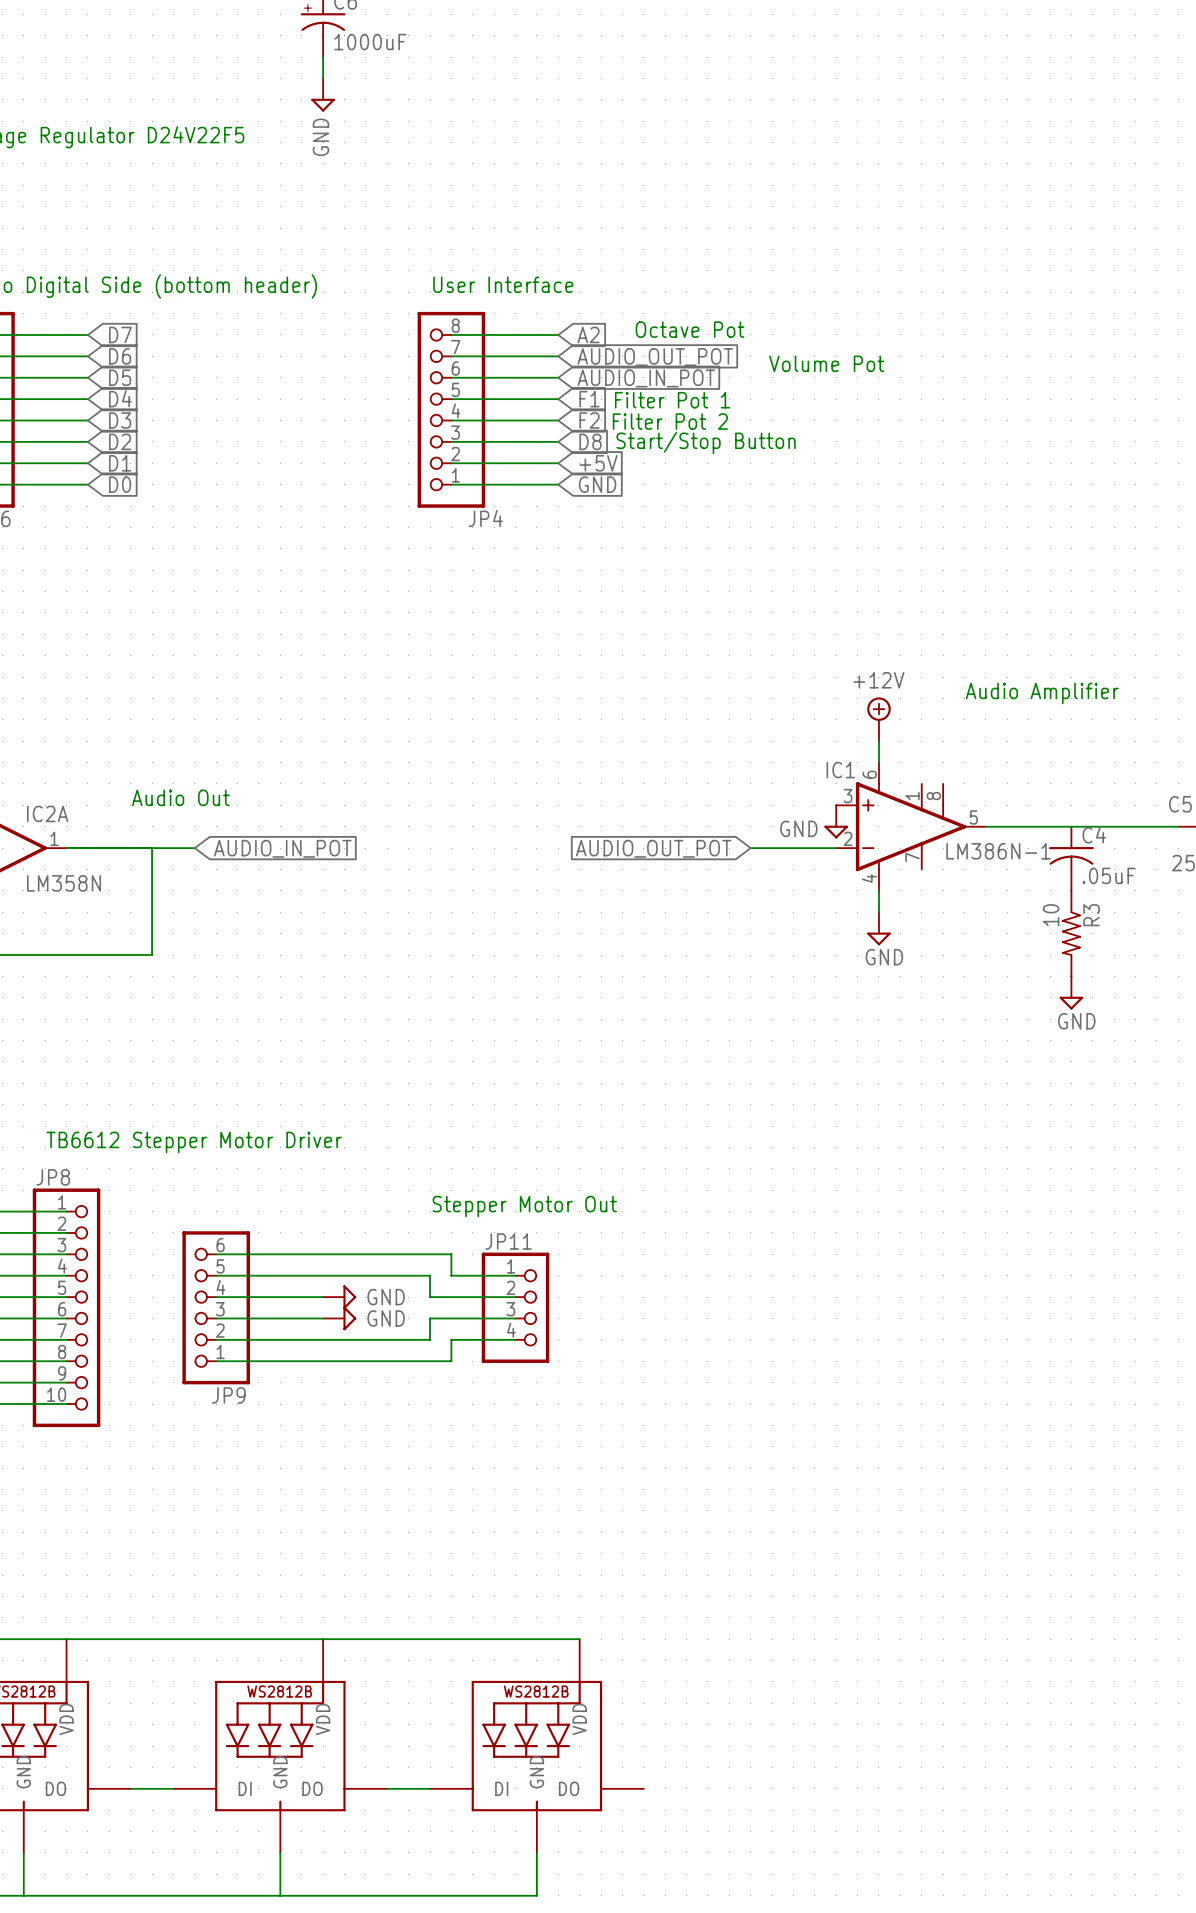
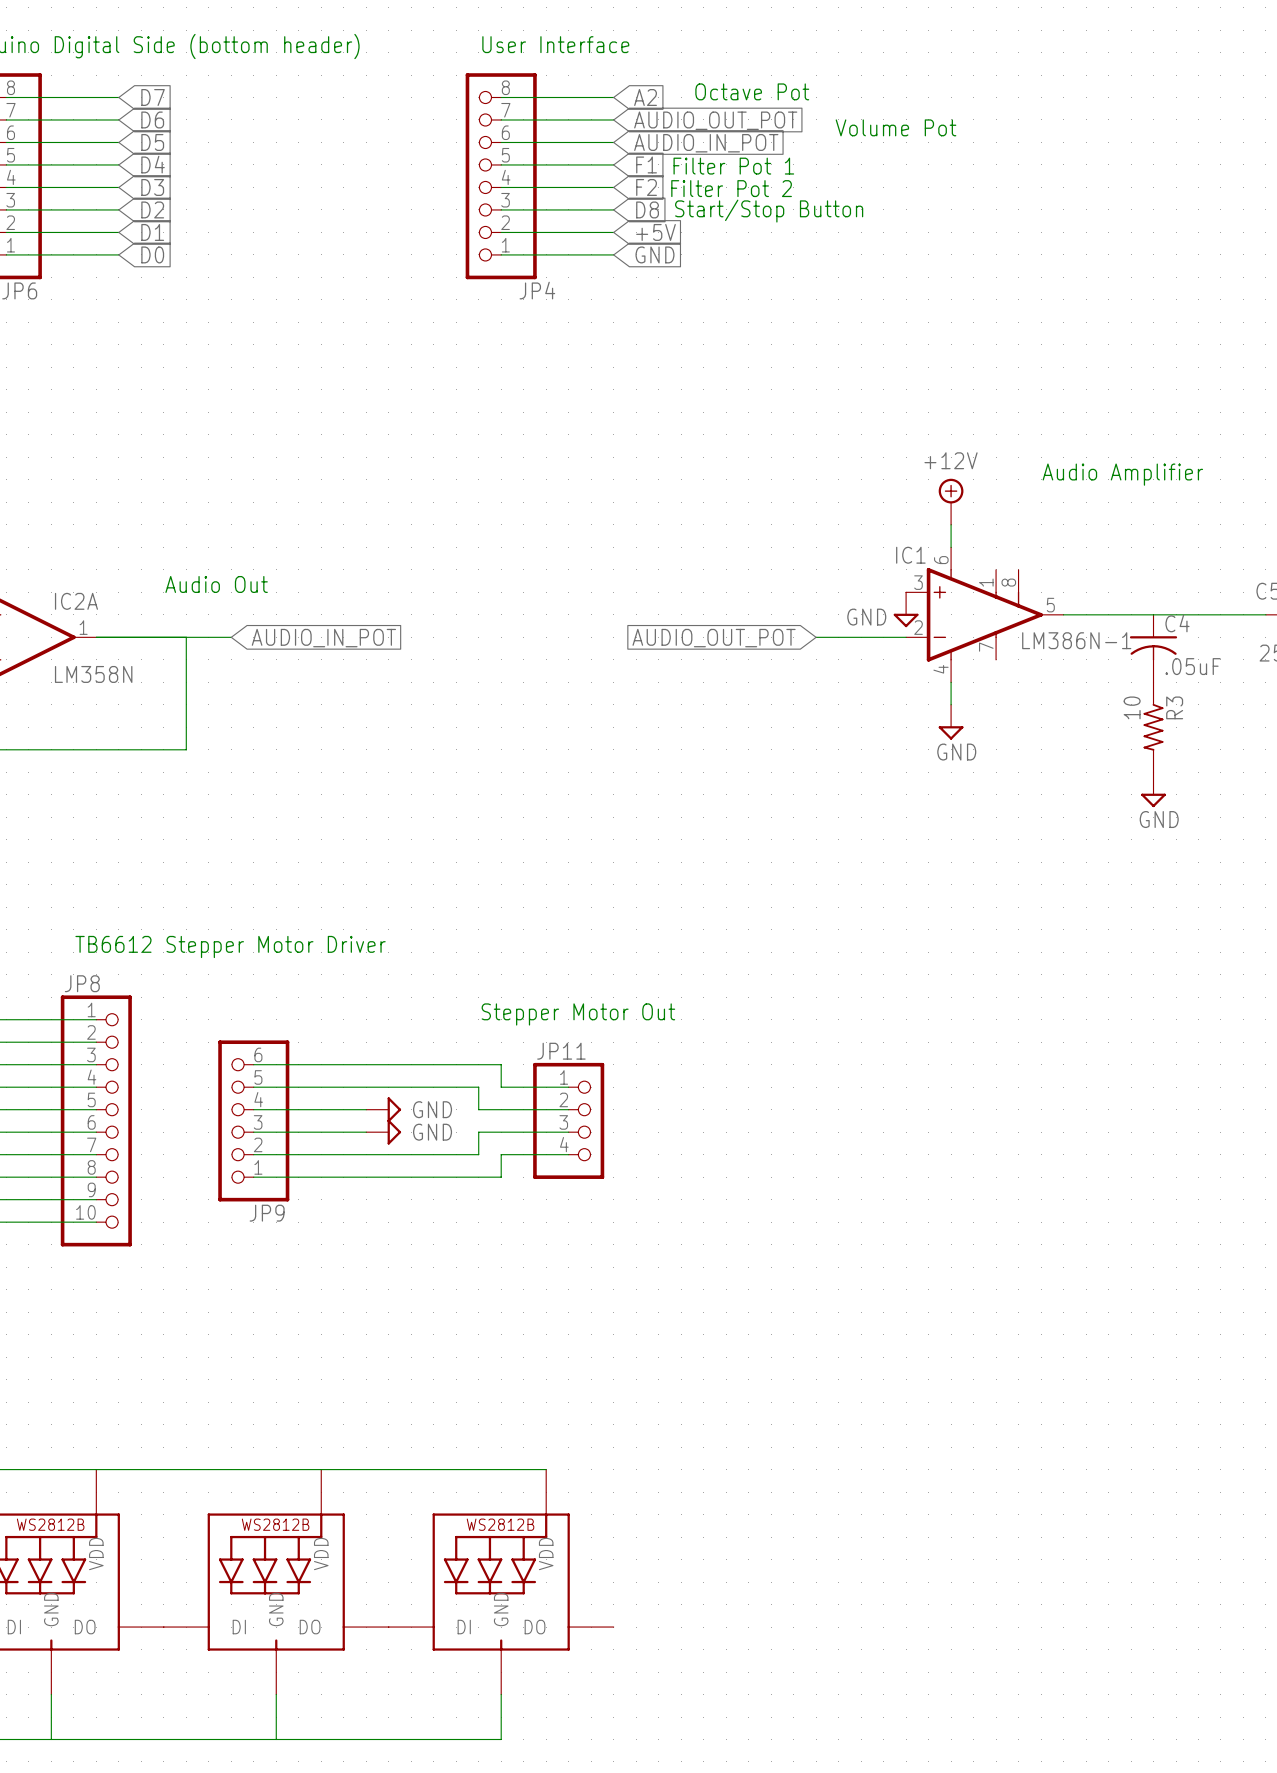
wire: (494, 1639) (579, 1639) -> none
part position: (280, 1746) -> (276, 1582)
part: none -> (501, 1582)
part: (536, 1746) -> none
wire: (387, 1788) (430, 1788) -> none
wire: (280, 1852) (280, 1895) -> (276, 1694) (276, 1739)
wire: (536, 1852) (536, 1895) (451, 1895) -> (501, 1694) (501, 1739)

